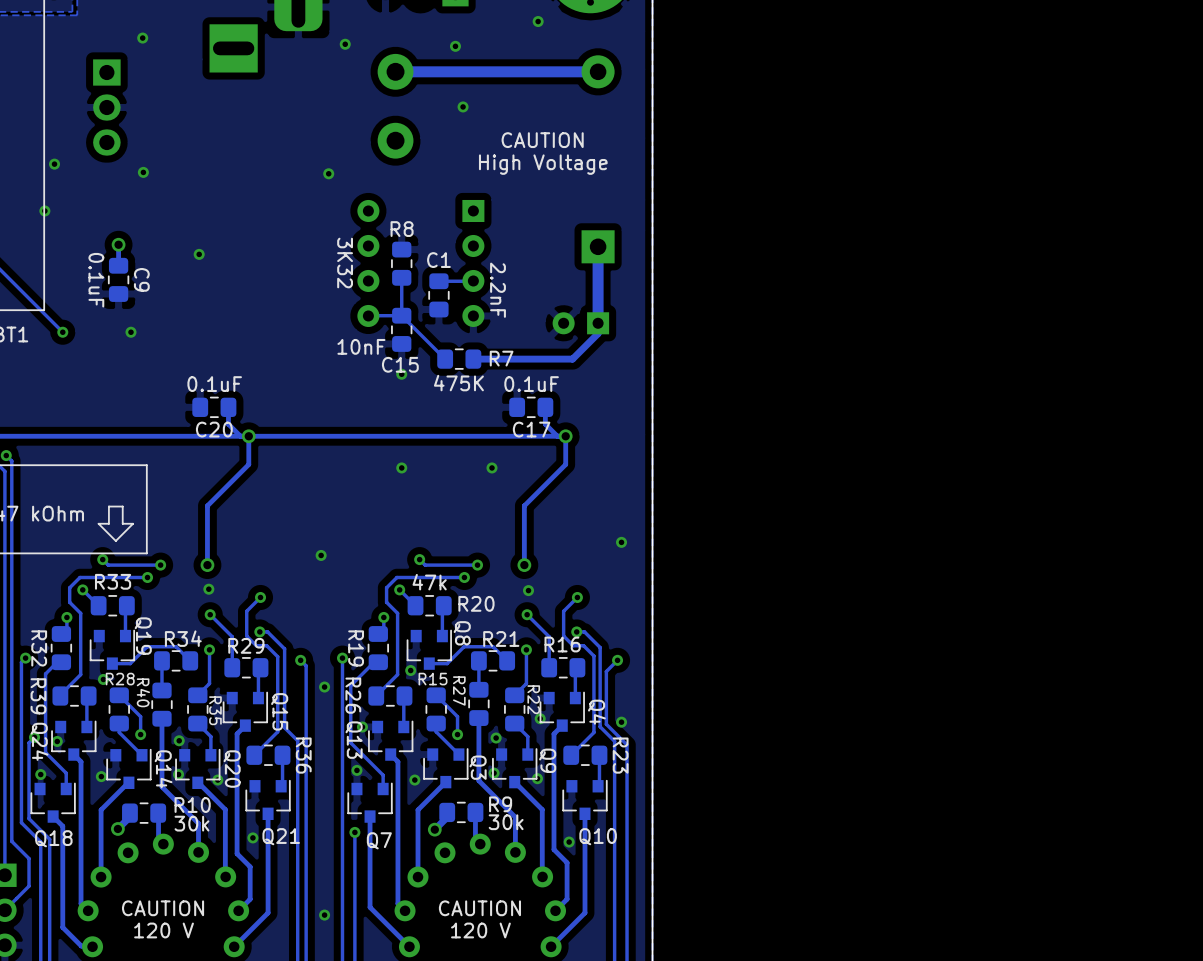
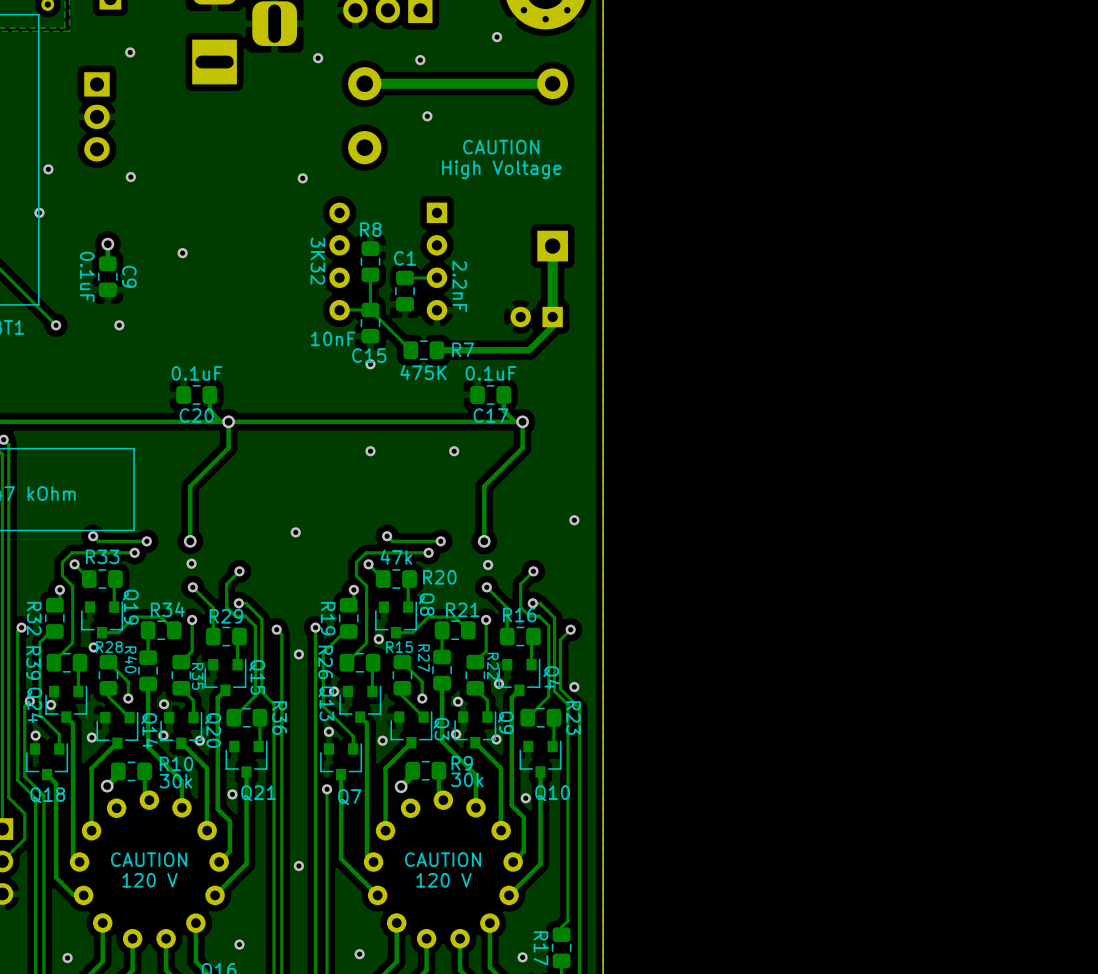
line: (122, 506) (108, 506) (108, 523) (98, 523) (115, 540) (133, 523) (122, 523) (122, 506) -> none

